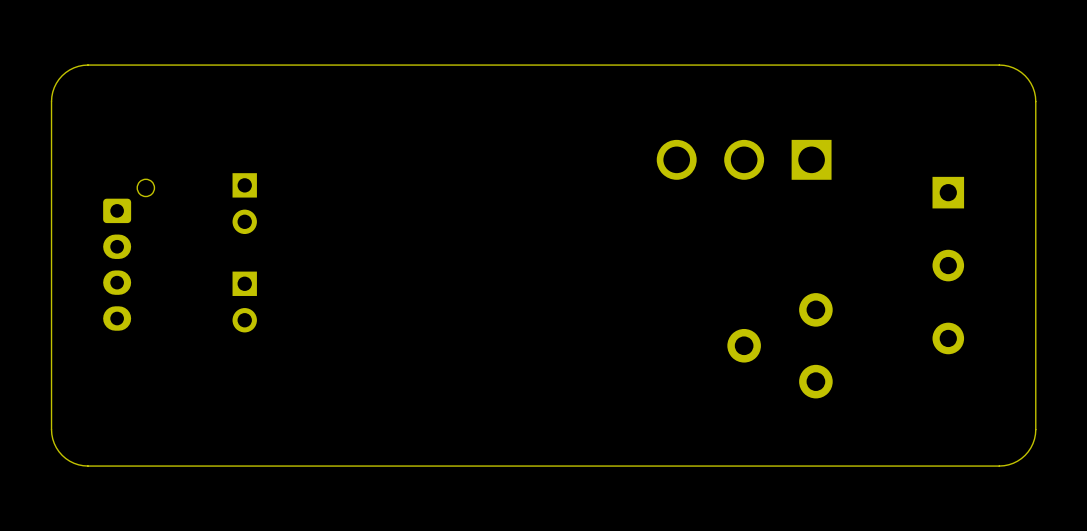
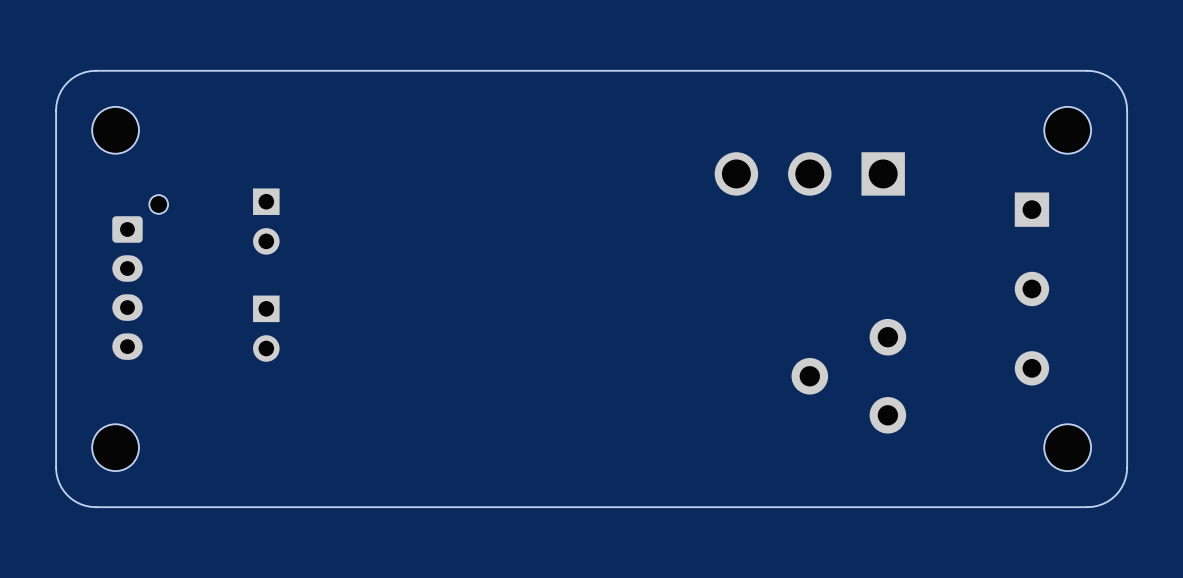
part: none -> (115, 130)
part: none -> (1067, 130)
part: none -> (115, 447)
part: none -> (1067, 447)

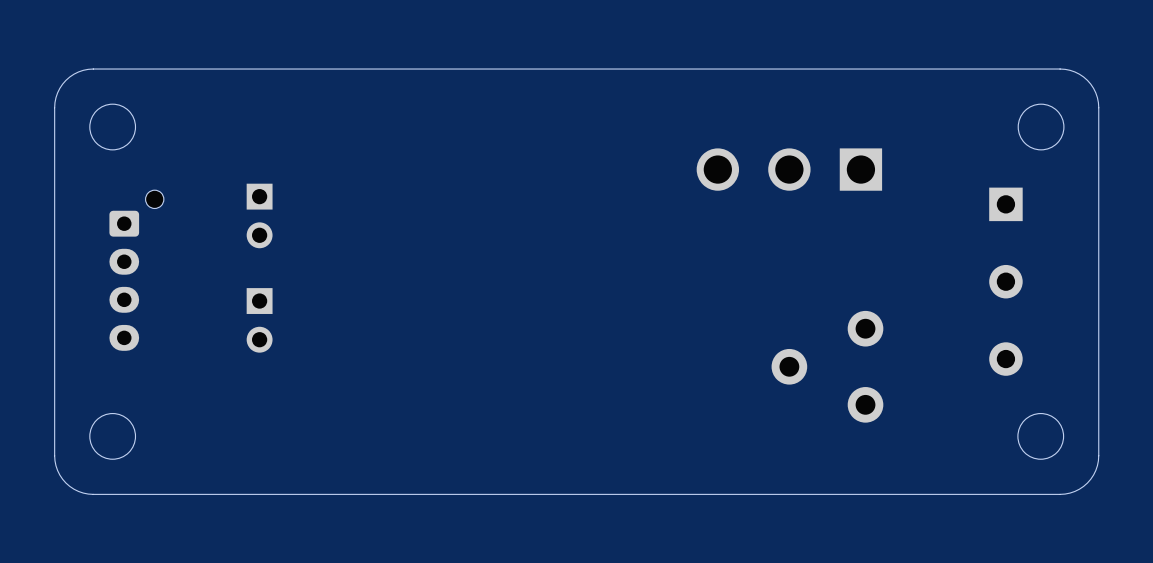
round board edge: none -> [89, 103, 136, 151]
round board edge: none -> [1017, 103, 1065, 151]
part: (115, 130) -> none
part: (1067, 130) -> none
round board edge: none -> [89, 413, 136, 460]
round board edge: none -> [1017, 413, 1064, 460]
part: (115, 447) -> none
part: (1067, 447) -> none

